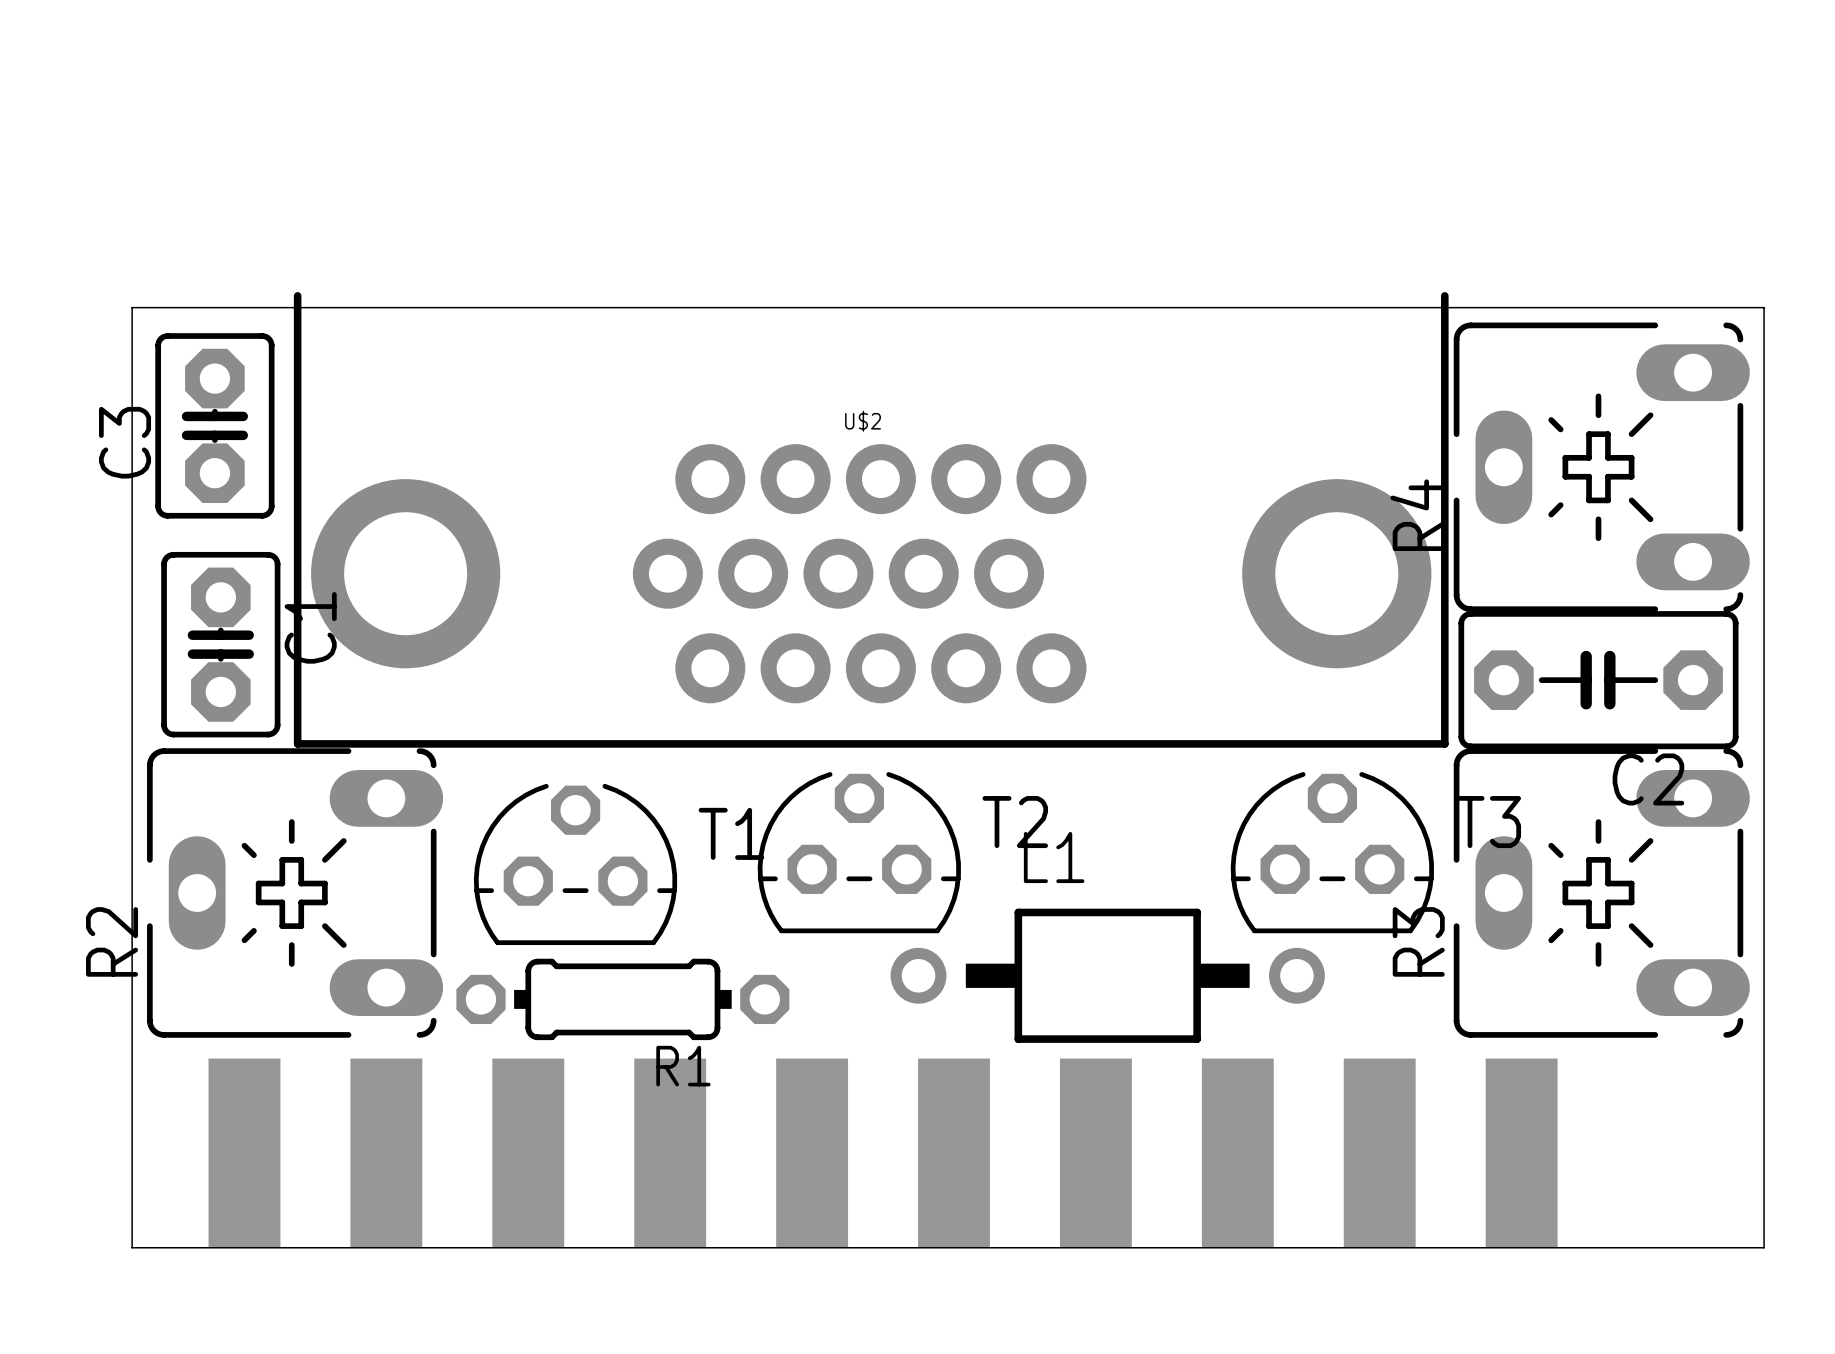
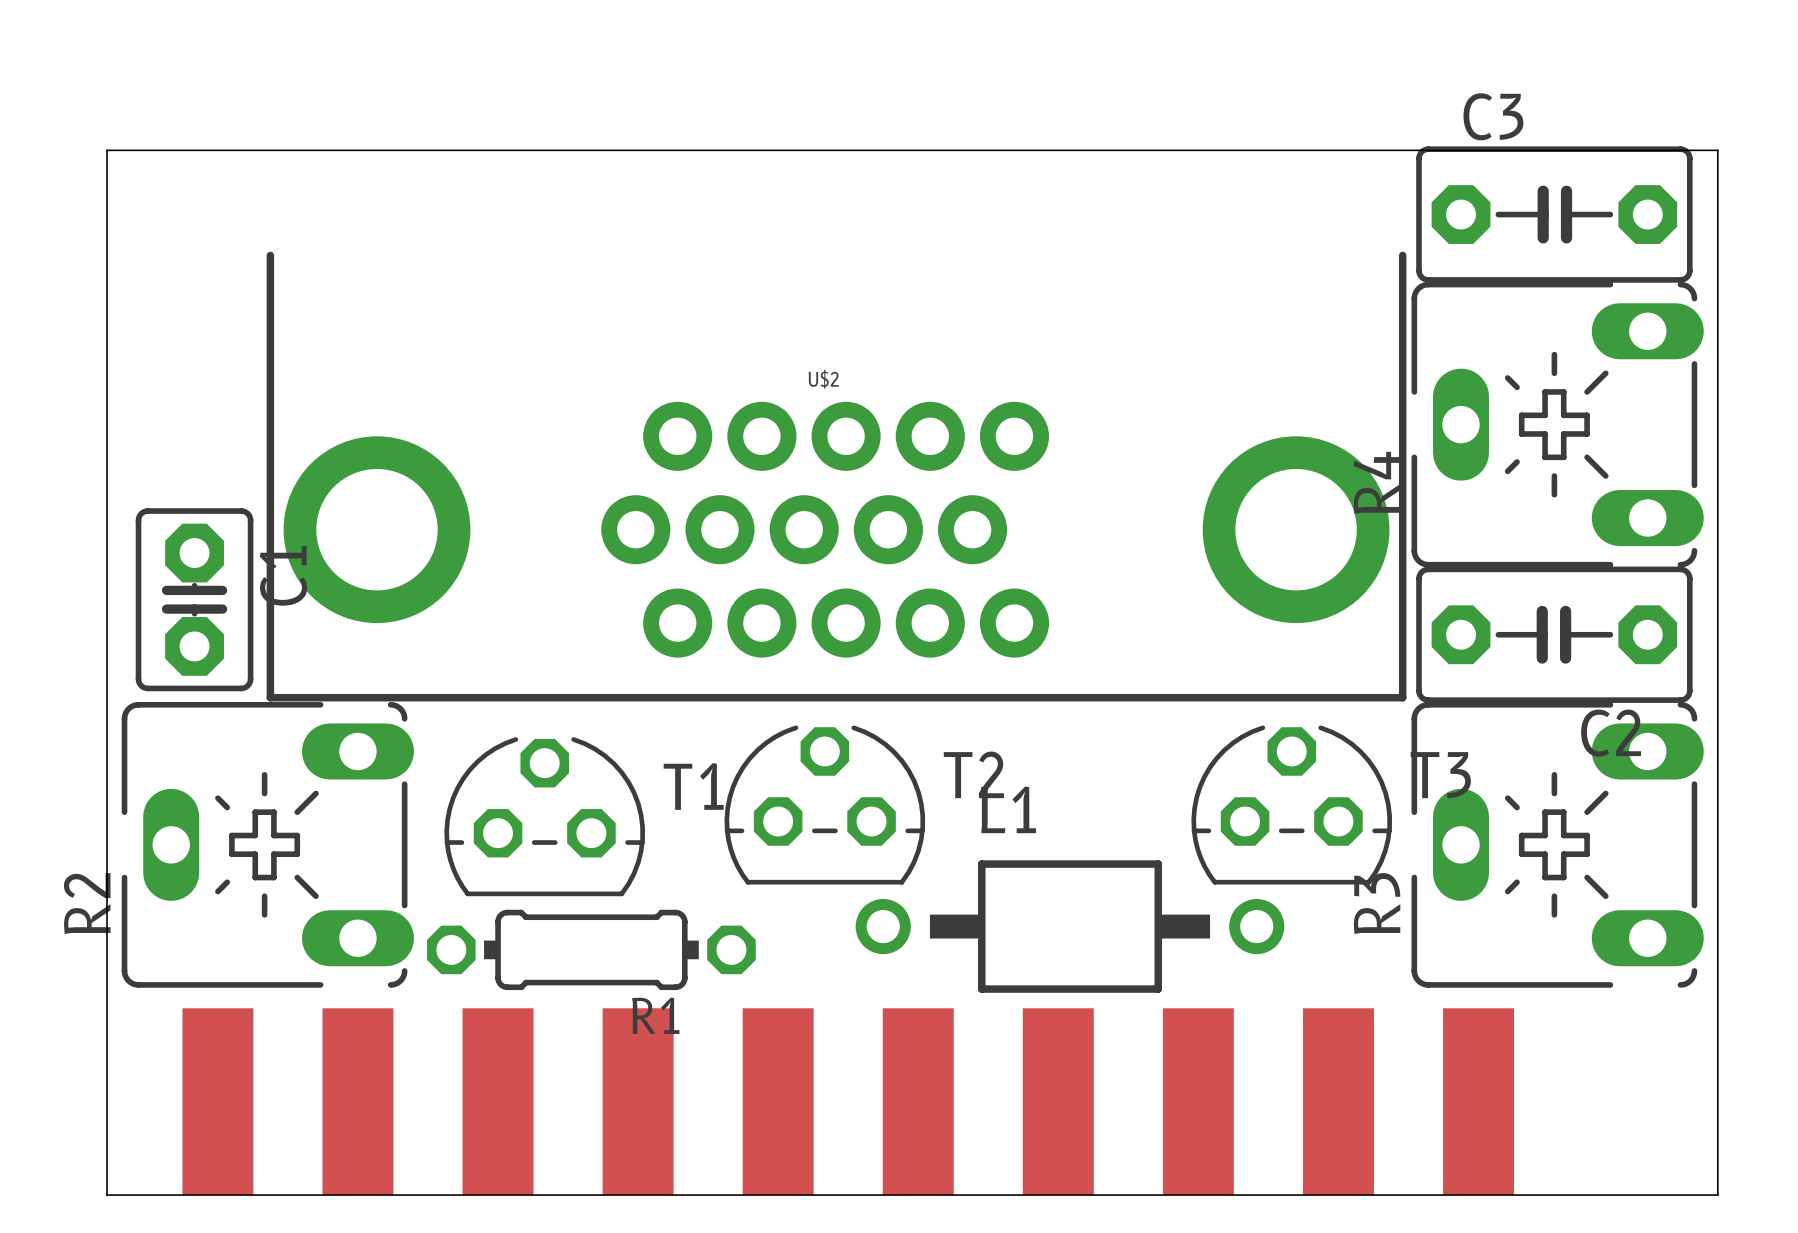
board edge: (132, 307) (1764, 307) -> (107, 267) (107, 150) (1717, 150) (1717, 267)
C3 footprint: [155, 333, 275, 519] -> [1416, 146, 1693, 283]
C3 name position: C3 (125, 442) -> C3 (1493, 116)

